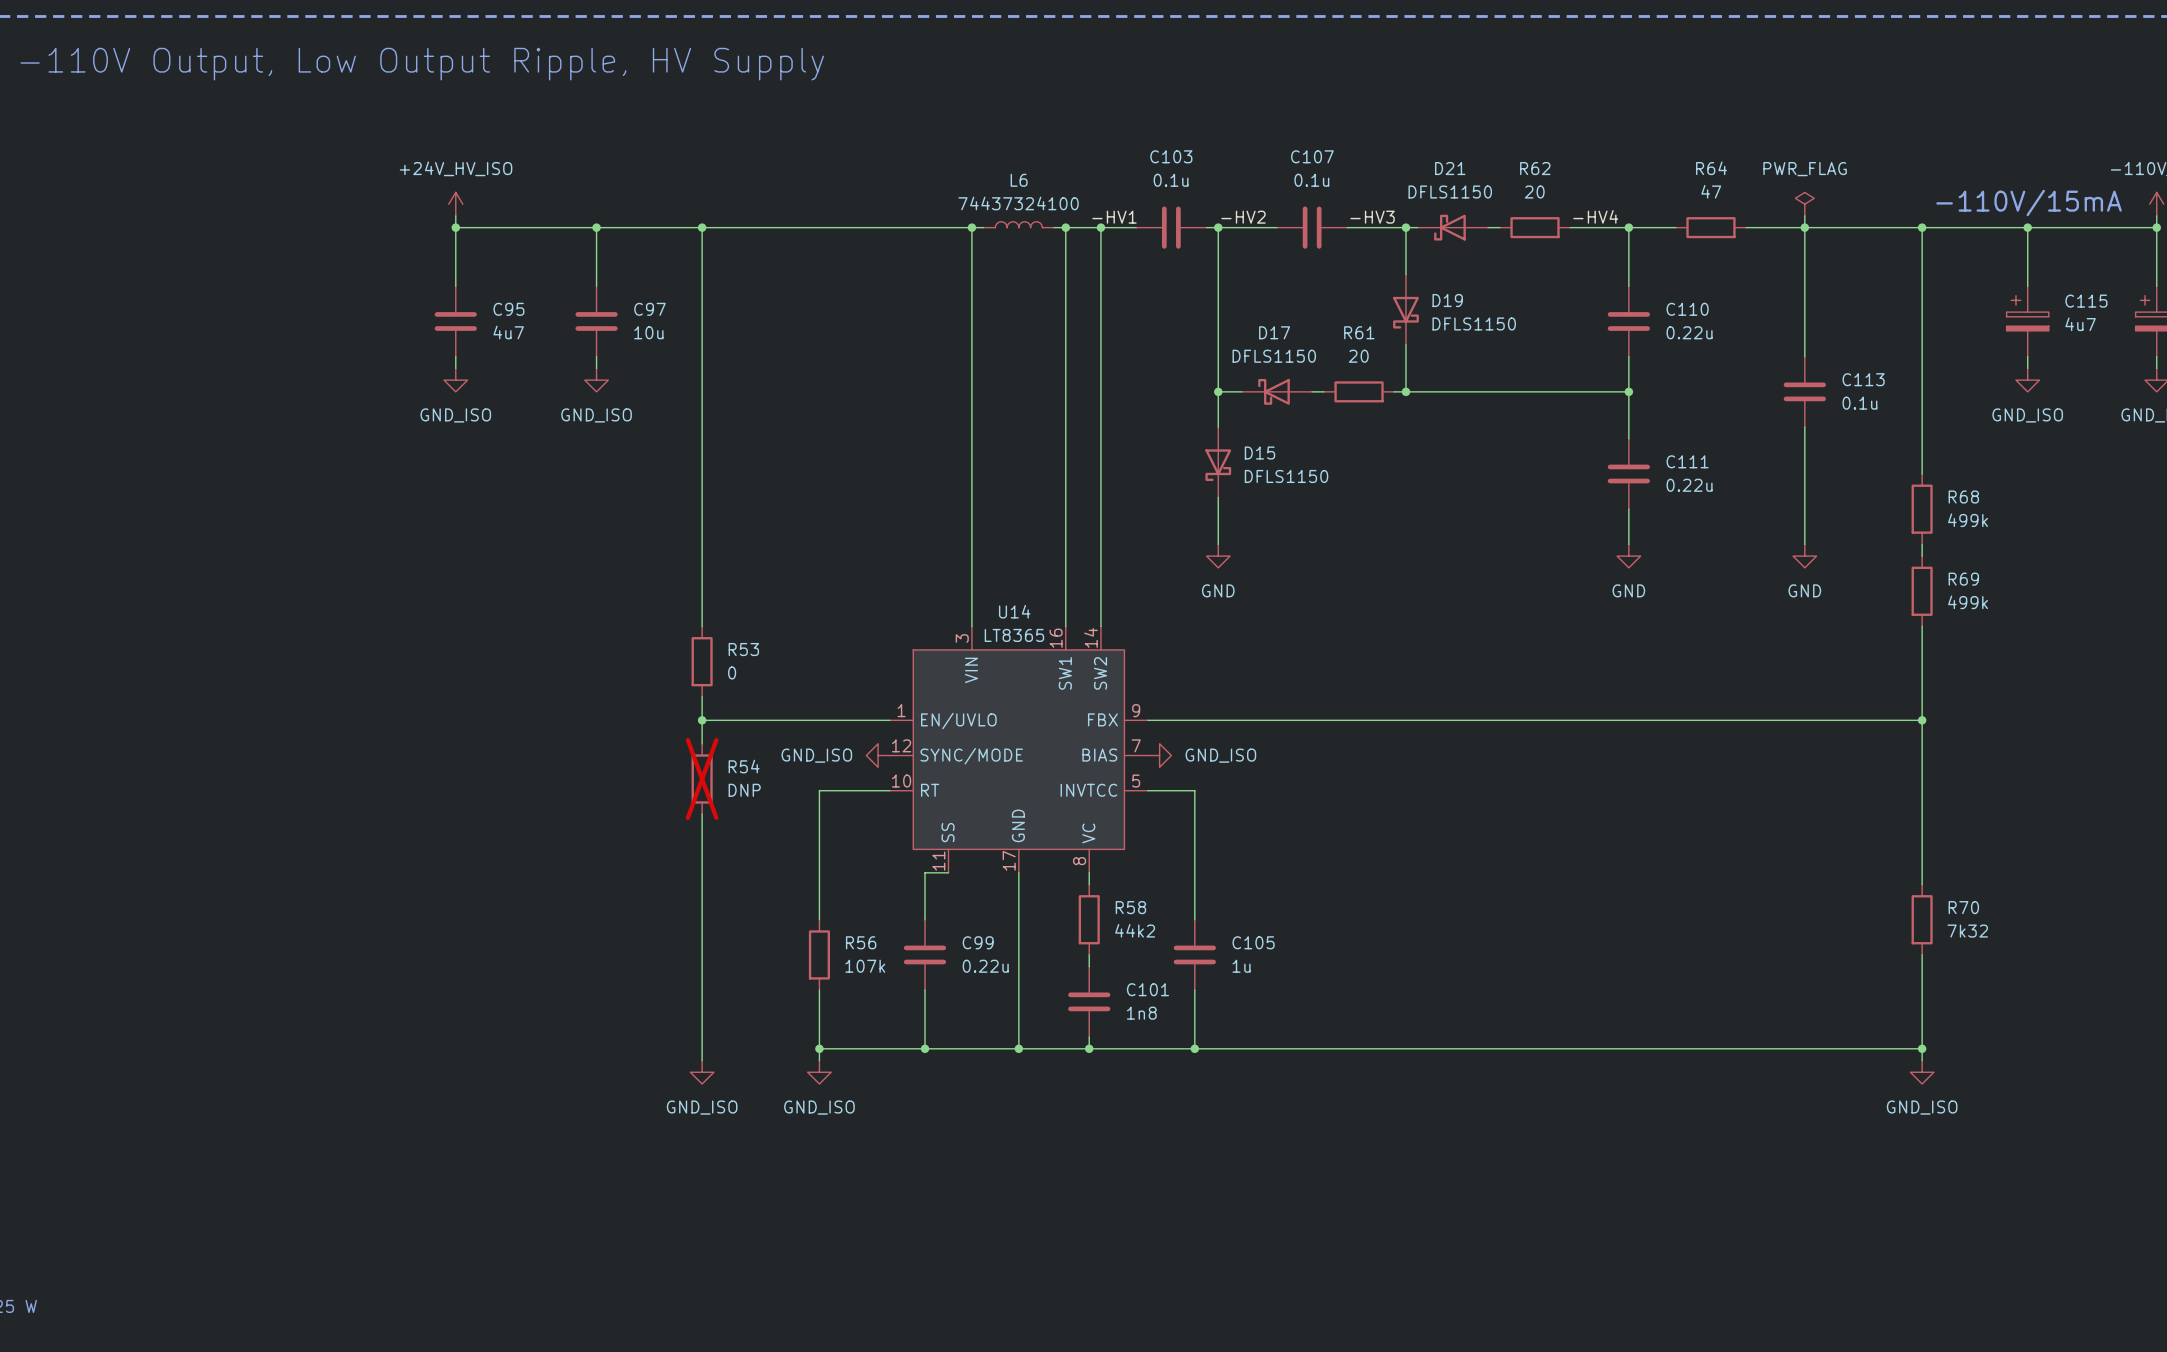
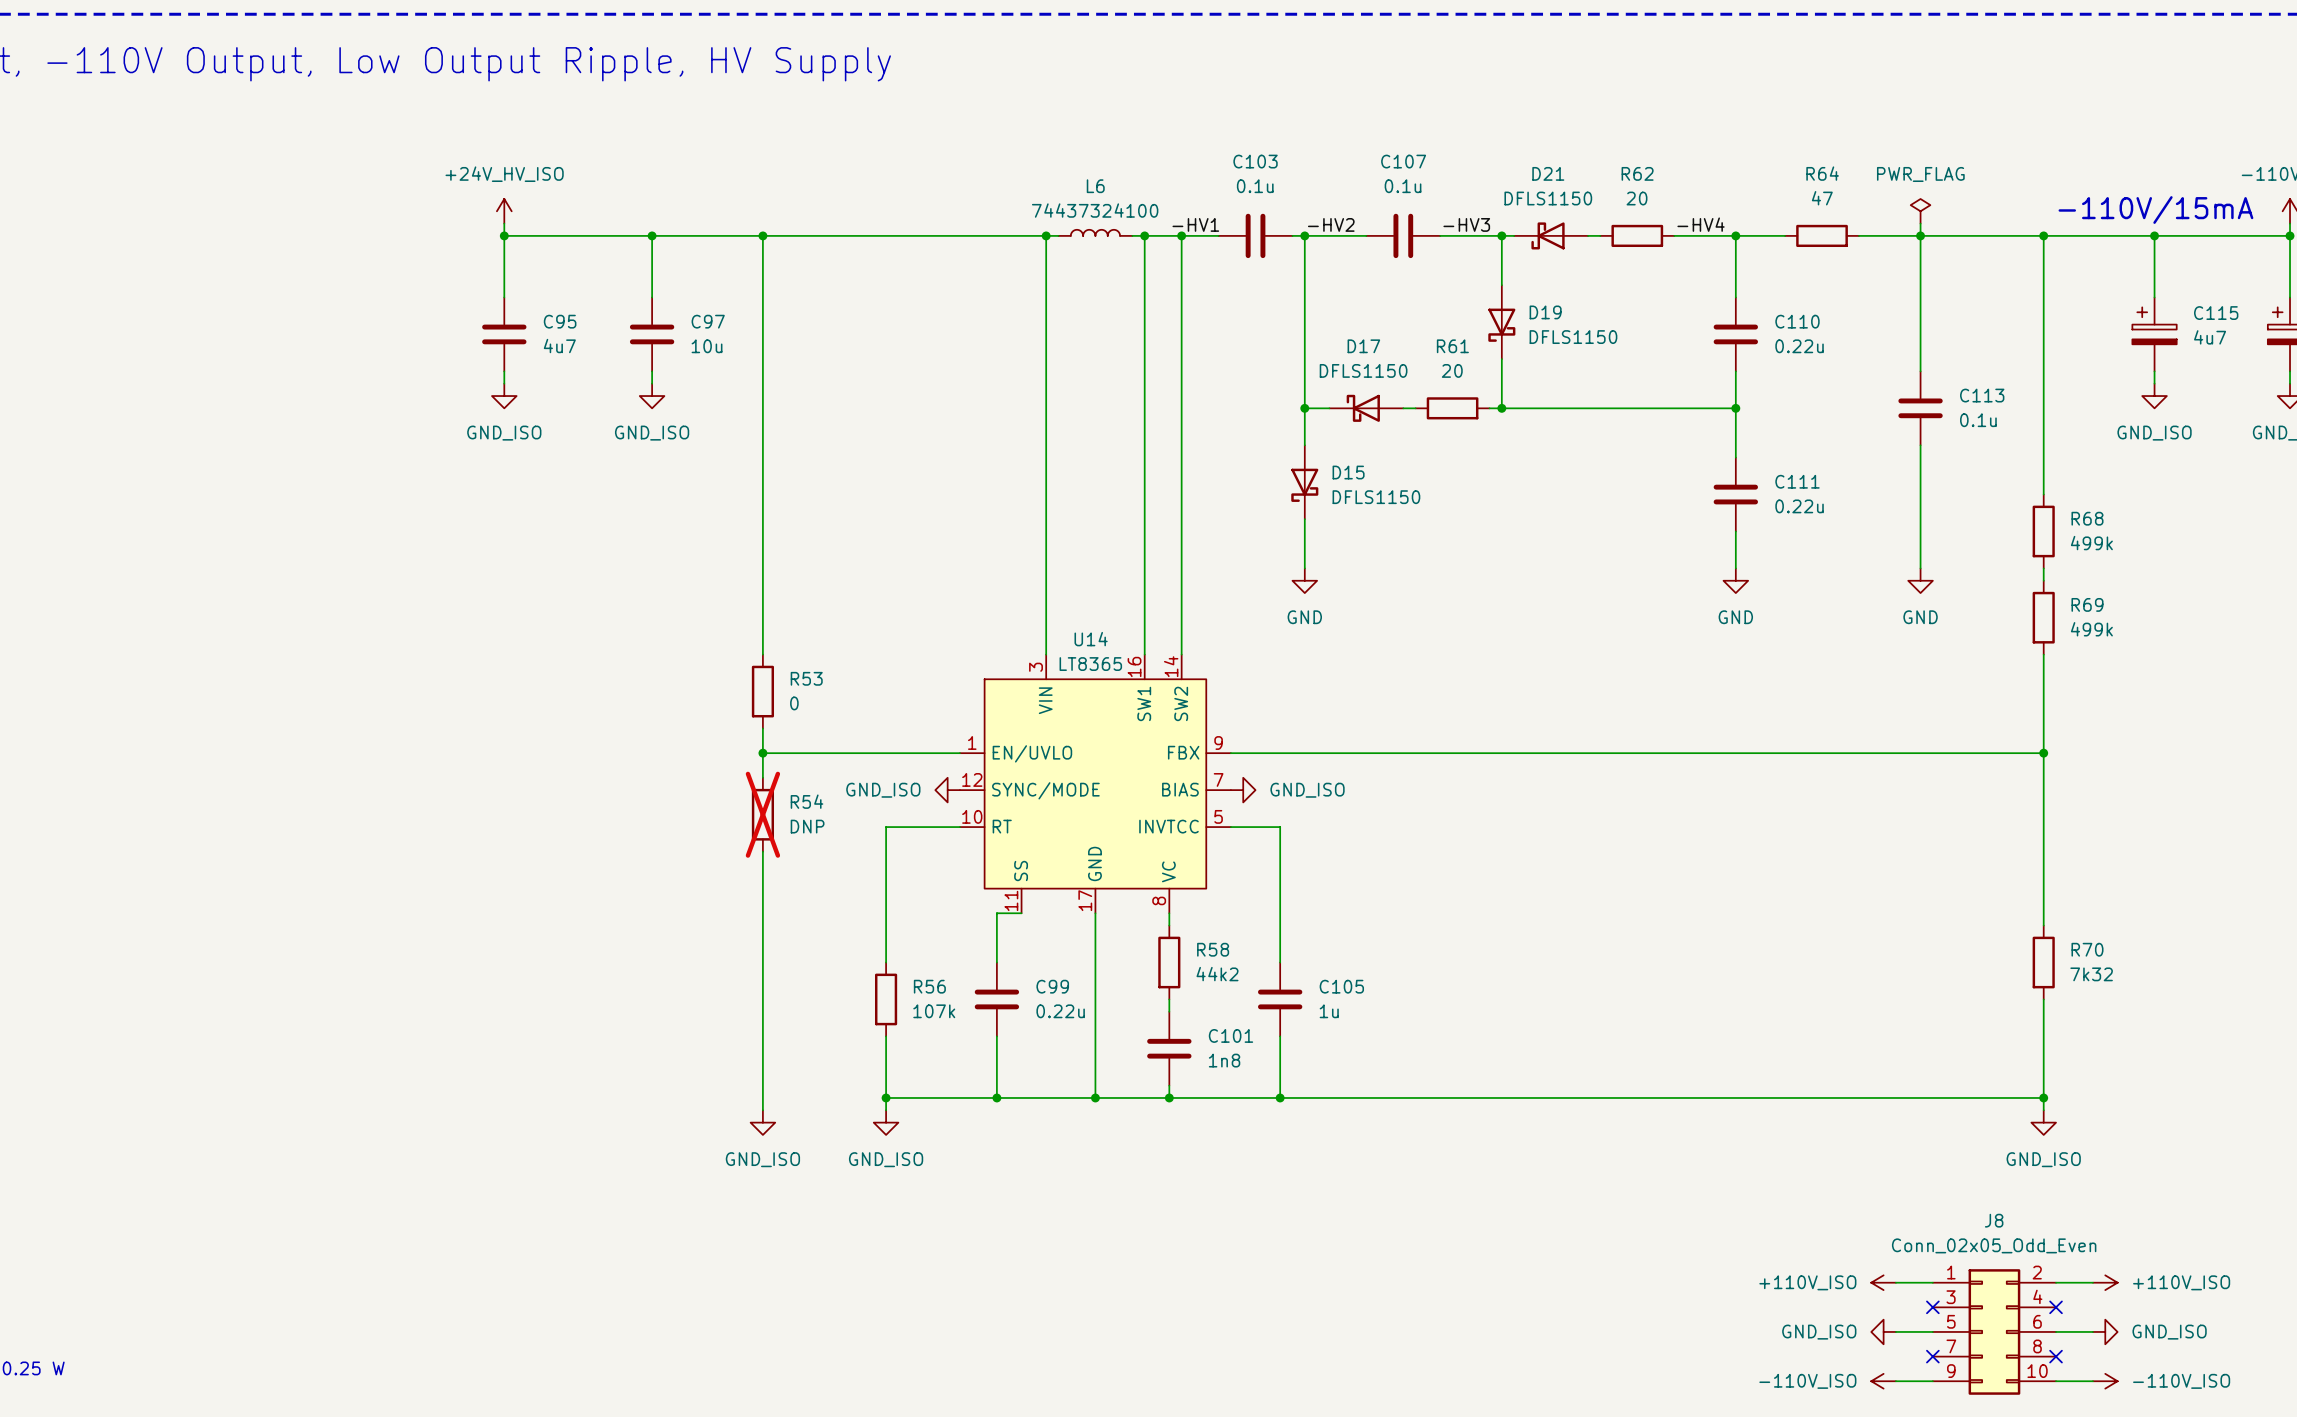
power symbol: none -> +110V_ISO (1883, 1282)
wire: none -> (1895, 1282) (1932, 1282)
wire: none -> (2056, 1282) (2092, 1282)
power symbol: none -> +110V_ISO (2105, 1282)
no-connect mark: none -> (1932, 1307)
no-connect mark: none -> (2056, 1307)
power symbol: none -> GND_ISO (1883, 1331)
wire: none -> (1895, 1331) (1932, 1331)
J8: none -> Conn_02x05_Odd_Even (1994, 1331)
wire: none -> (2056, 1331) (2092, 1331)
power symbol: none -> GND_ISO (2105, 1331)
no-connect mark: none -> (1932, 1356)
no-connect mark: none -> (2056, 1356)
power symbol: none -> -110V_ISO (1883, 1381)
wire: none -> (1895, 1381) (1932, 1381)
wire: none -> (2056, 1381) (2092, 1381)
power symbol: none -> -110V_ISO (2105, 1381)

